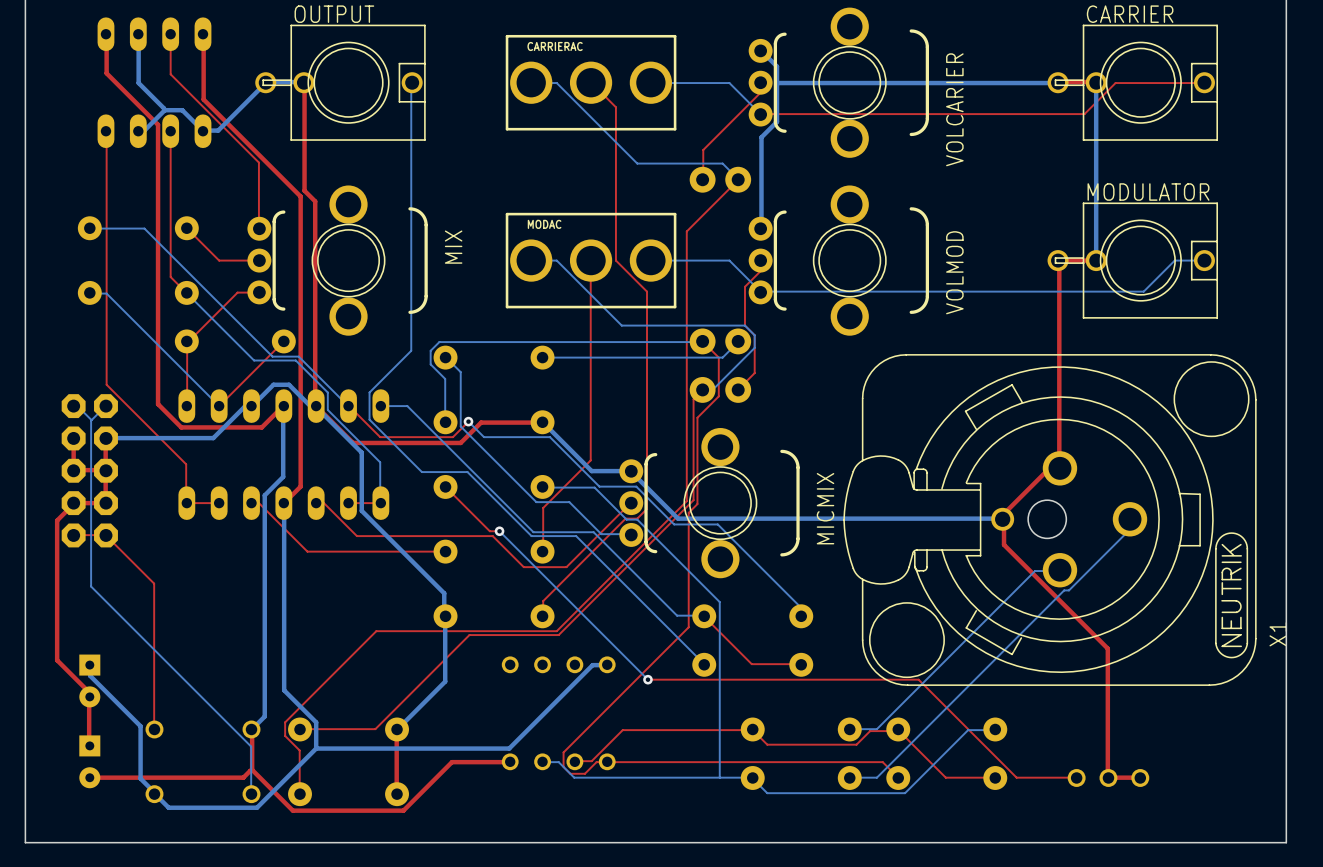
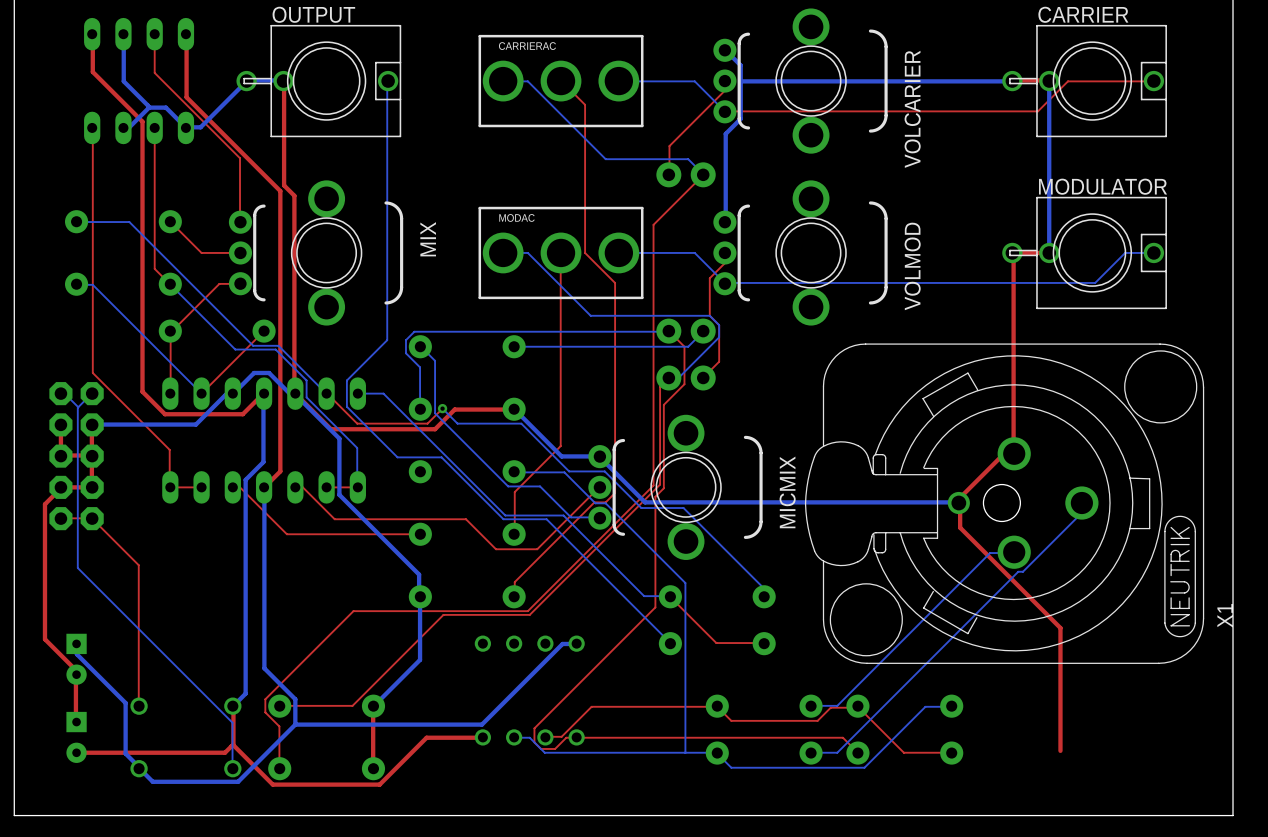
top track: (445, 486) (489, 531) (499, 531) -> none
bottom track: (499, 531) (647, 679) -> none
via: (499, 531) -> none
top track: (647, 679) (918, 679) (1016, 777) (1076, 777) -> none
via: (647, 679) -> none
top track: (1107, 775) (1108, 777) (1140, 777) -> none
part: (1108, 777) -> none

